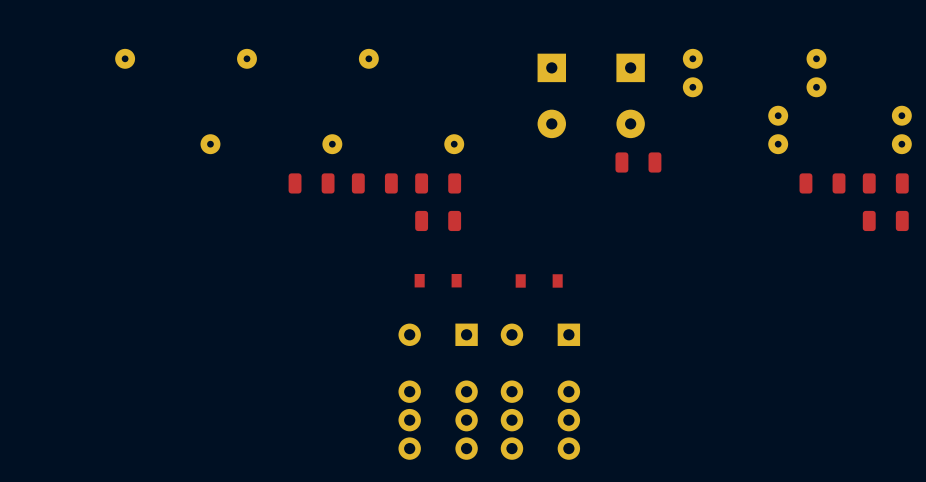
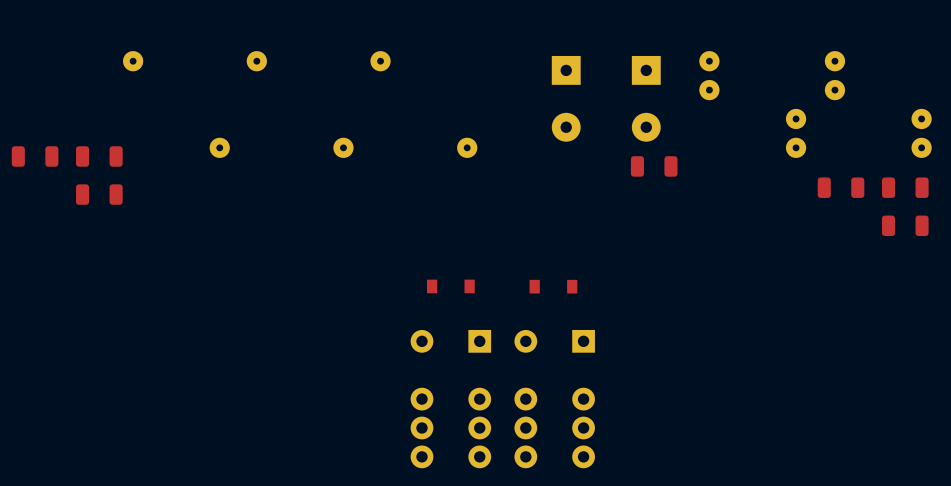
part: none -> (35, 156)
part: none -> (99, 156)
part: (311, 183) -> none
part: (374, 183) -> none
part: (438, 183) -> none
part: none -> (99, 194)
part: (438, 220) -> none

